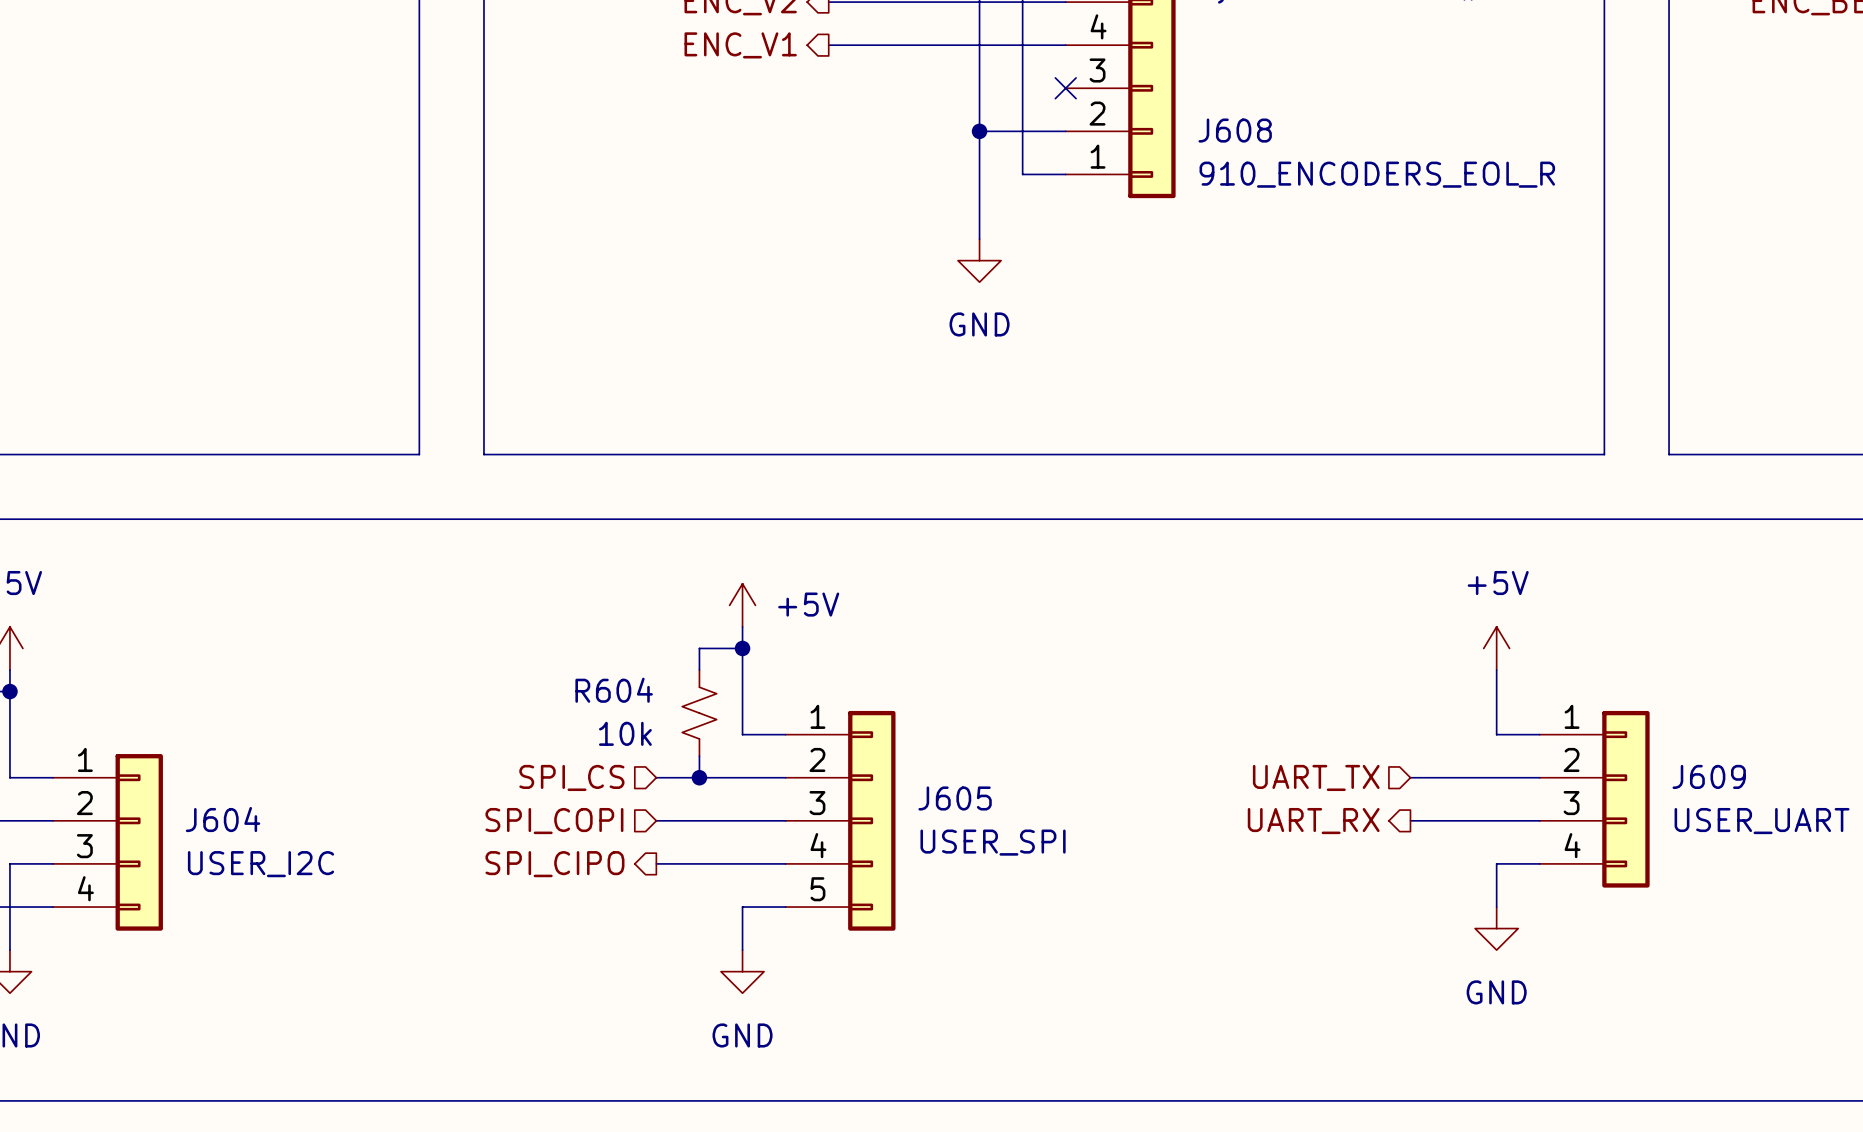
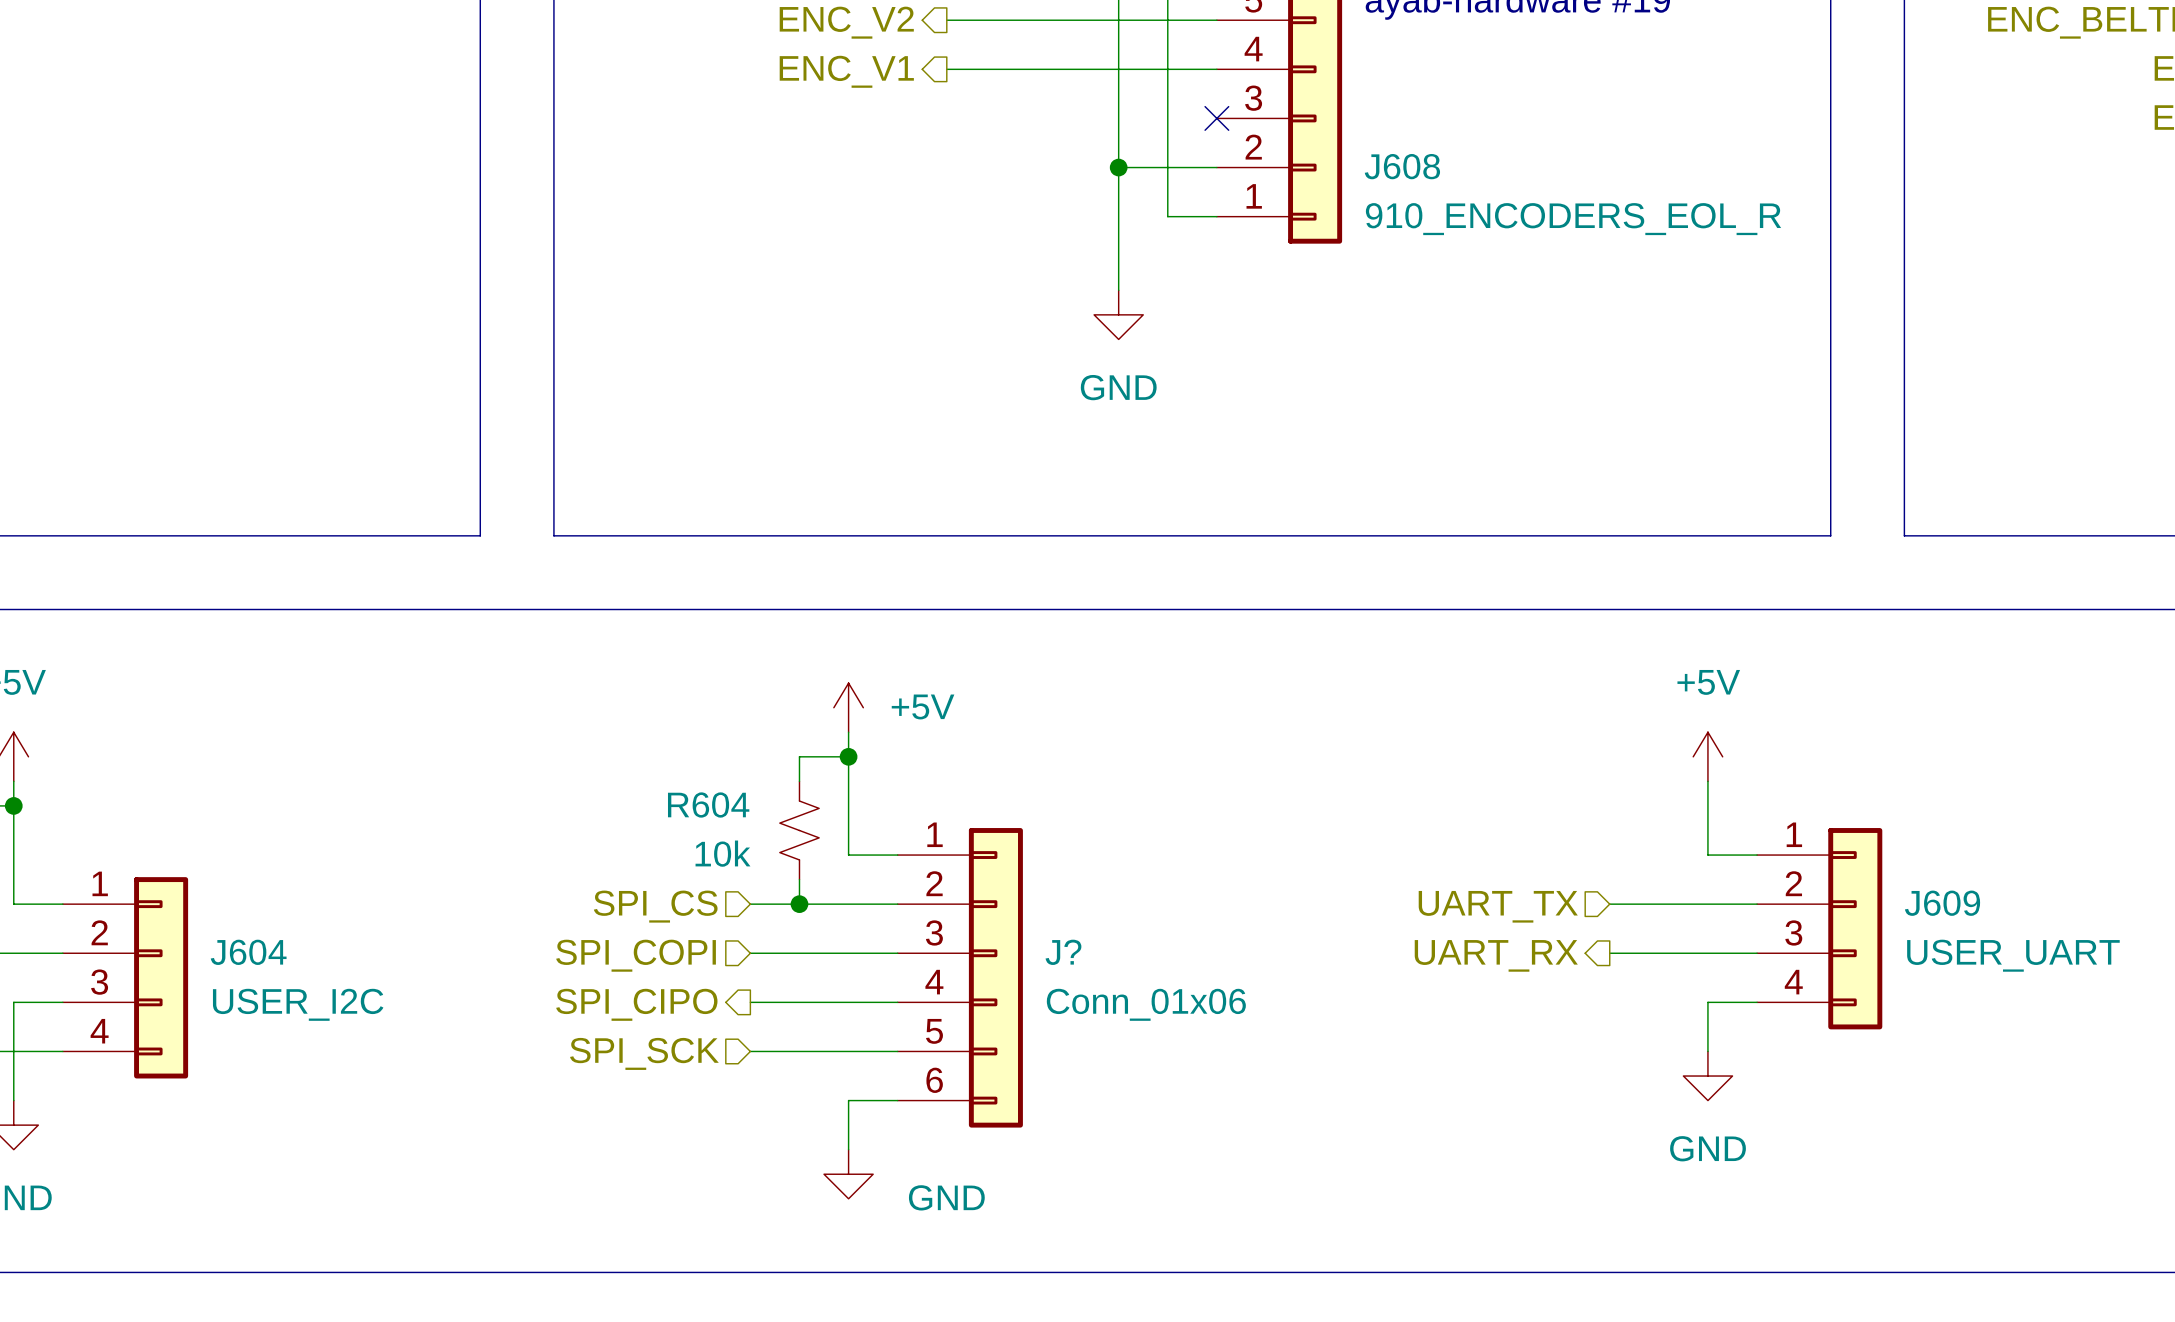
J605: USER_SPI (840, 820) -> none
J?: none -> Conn_01x06 (960, 977)
hierarchical label: none -> SPI_SCK (644, 1053)
wire: (742, 907) (742, 950) -> (848, 1051) (750, 1051)
wire: none -> (897, 1100) (848, 1100) (848, 1149)
power symbol position: GND (742, 971) -> GND (848, 1174)
power symbol text position: GND (742, 1035) -> GND (946, 1197)

